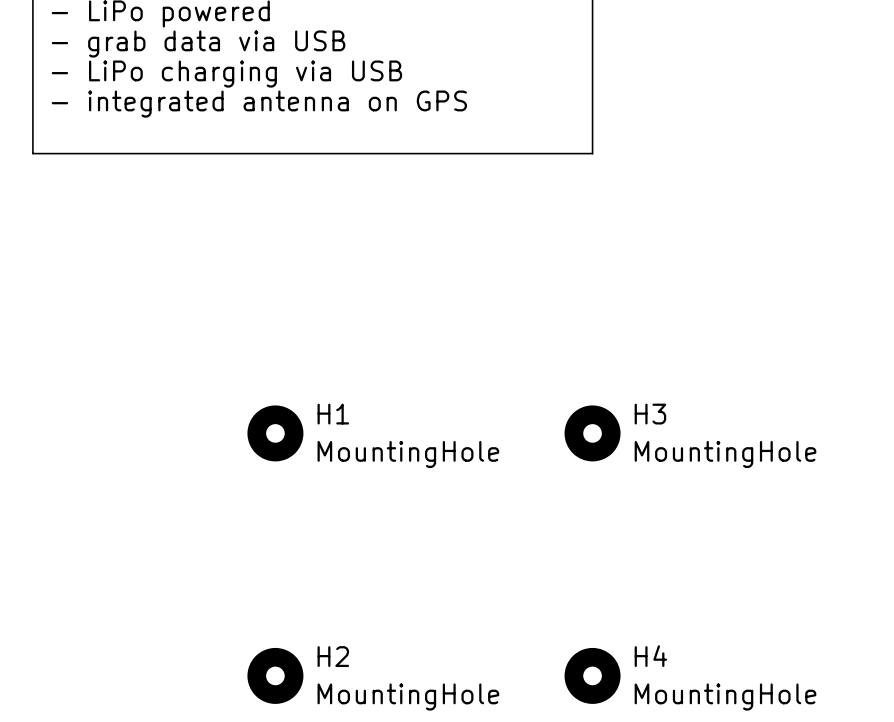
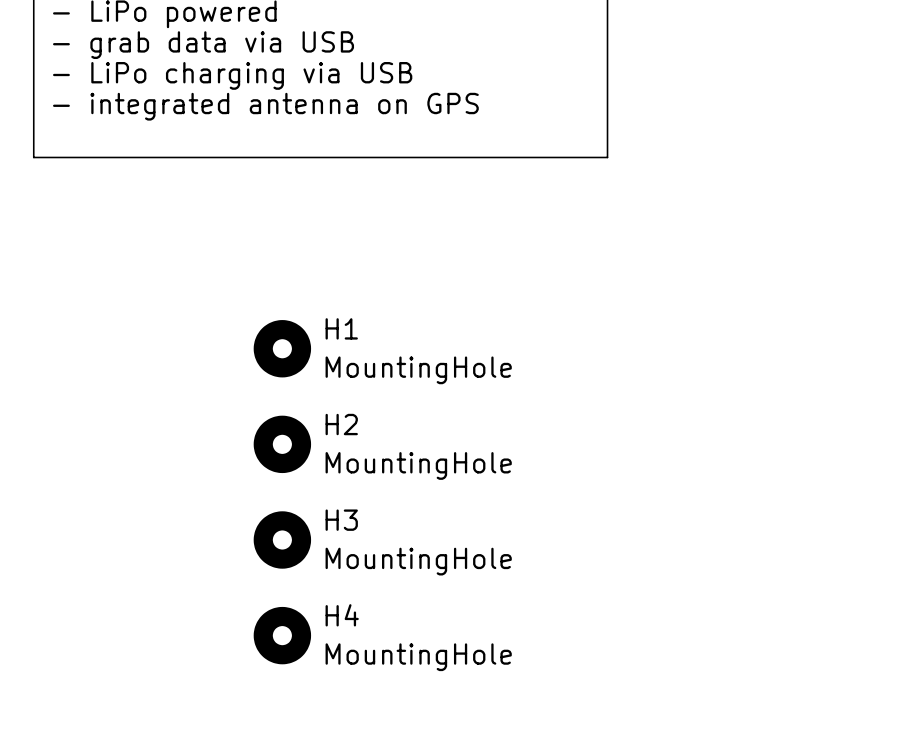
H1: none -> MountingHole (282, 348)
H1 name: H1 (333, 414) -> H2 (341, 424)
H3 position: (592, 433) -> (282, 539)
H2: MountingHole (275, 675) -> none
H4 position: (592, 675) -> (282, 635)

